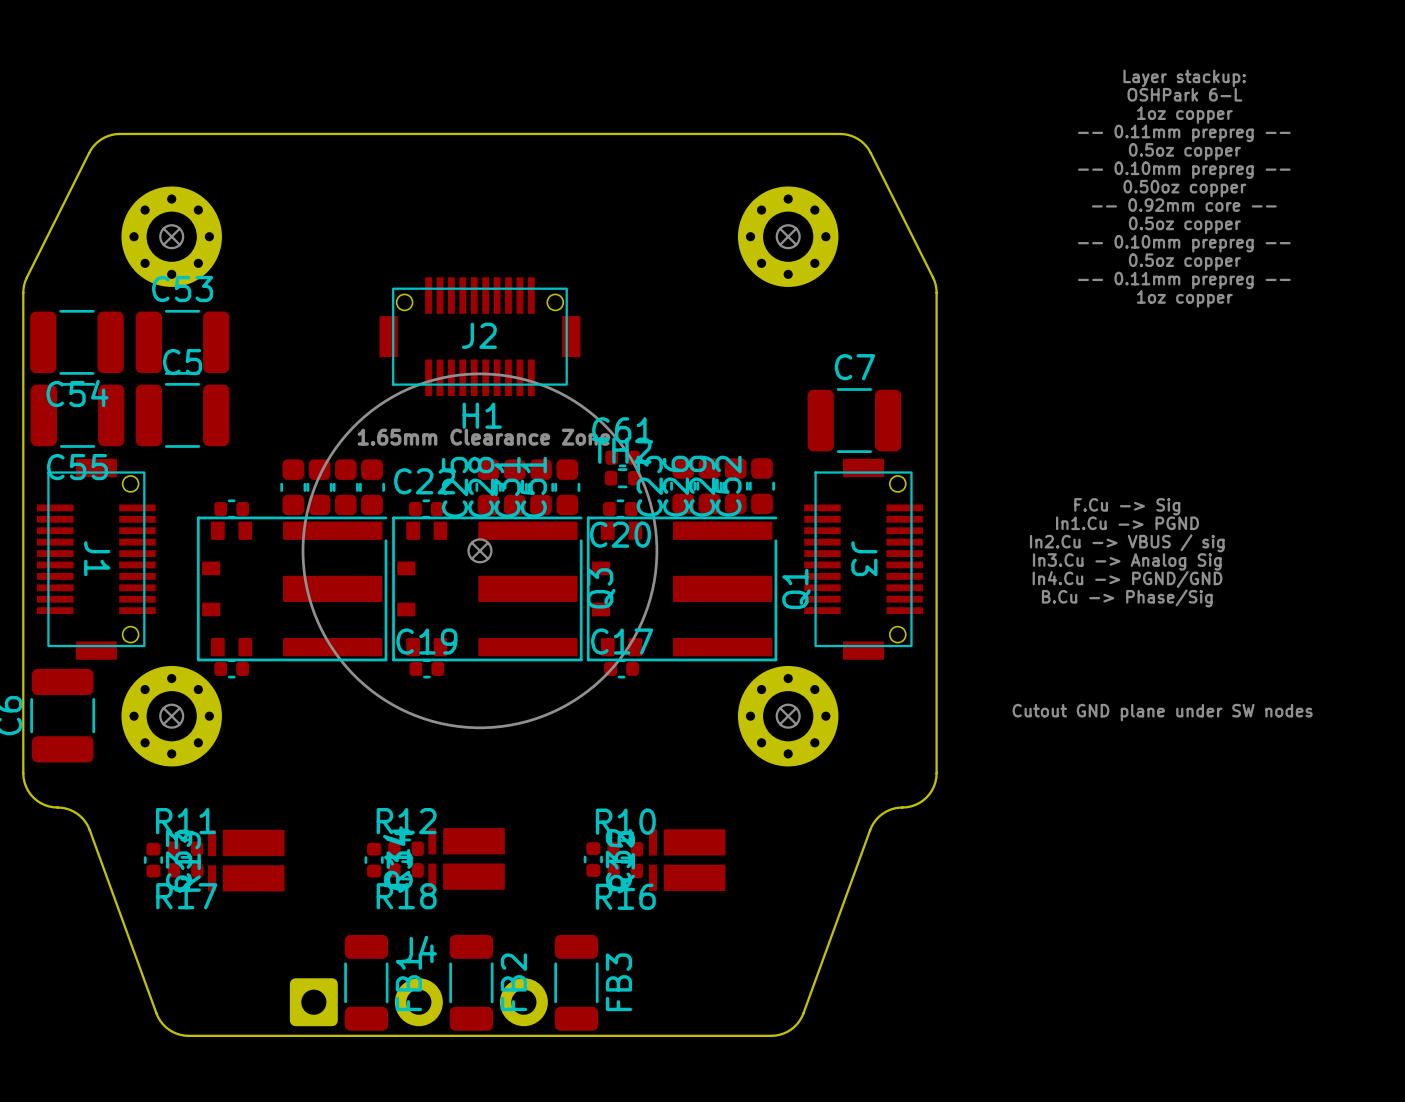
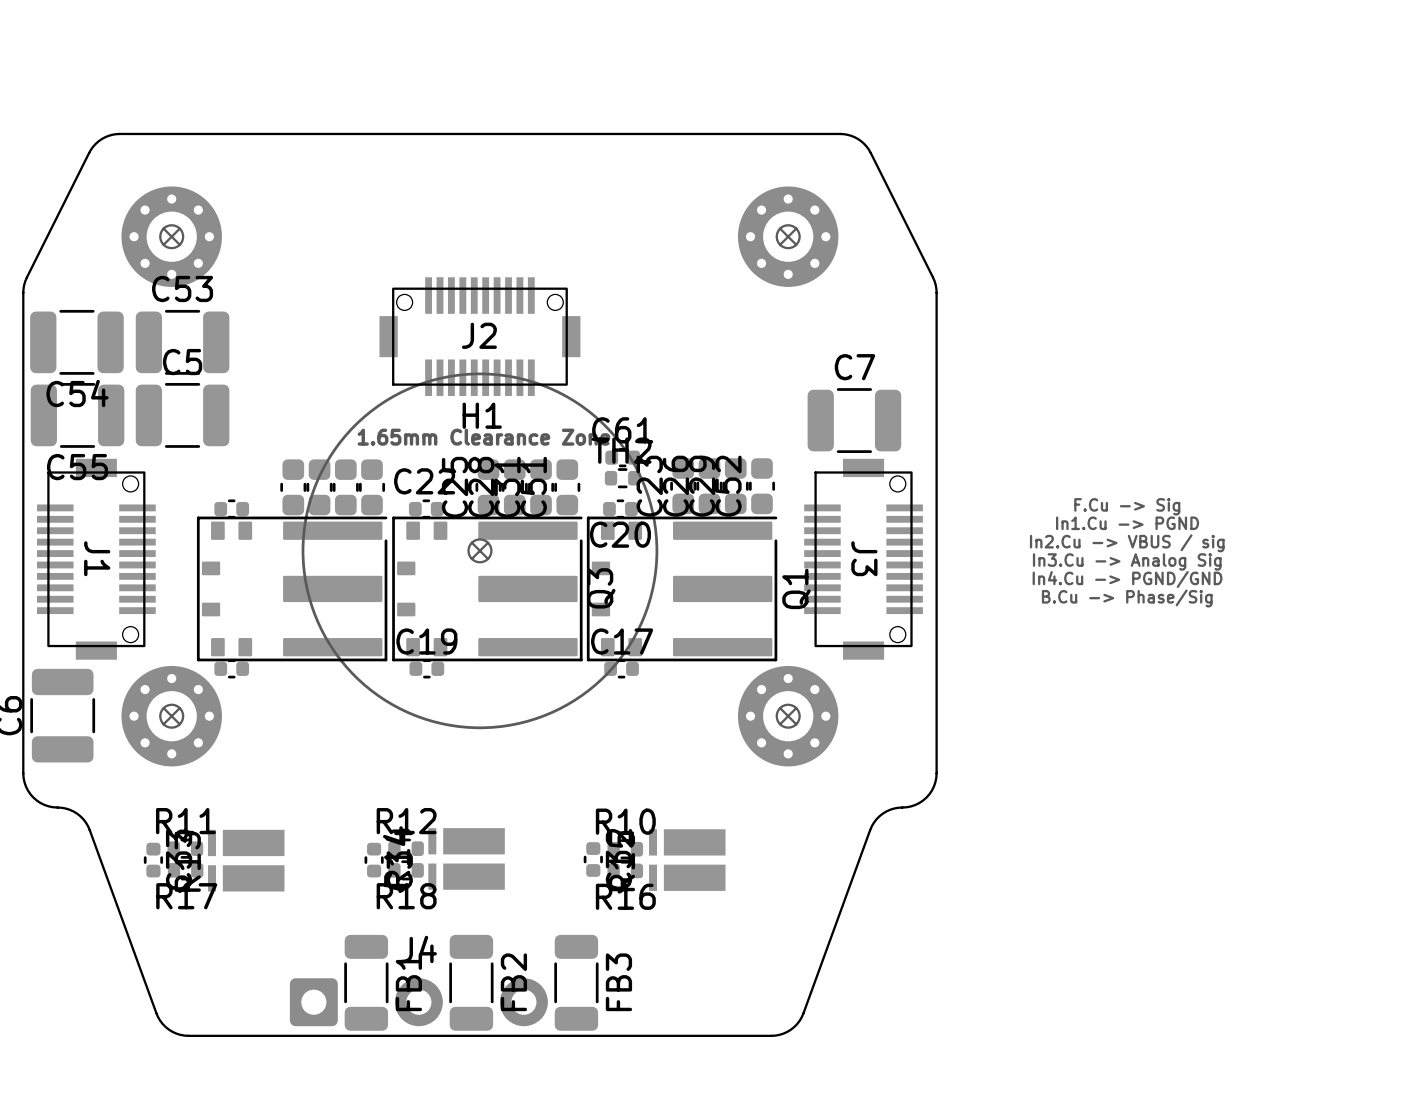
text: Layer stackup: (1184, 78) -> none
text: OSHPark 6-L (1184, 94) -> none
text: 1oz copper (1184, 115) -> none
text: -- 0.11mm prepreg -- (1184, 133) -> none
text: 0.5oz copper (1184, 151) -> none
text: -- 0.10mm prepreg -- (1184, 170) -> none
text: 0.50oz copper (1184, 188) -> none
text: -- 0.92mm core -- (1184, 205) -> none
text: 0.5oz copper (1184, 225) -> none
text: -- 0.10mm prepreg -- (1184, 243) -> none
text: 0.5oz copper (1184, 262) -> none
text: -- 0.11mm prepreg -- (1184, 280) -> none
text: 1oz copper (1184, 298) -> none
text: Cutout GND plane under SW nodes (1162, 712) -> none

